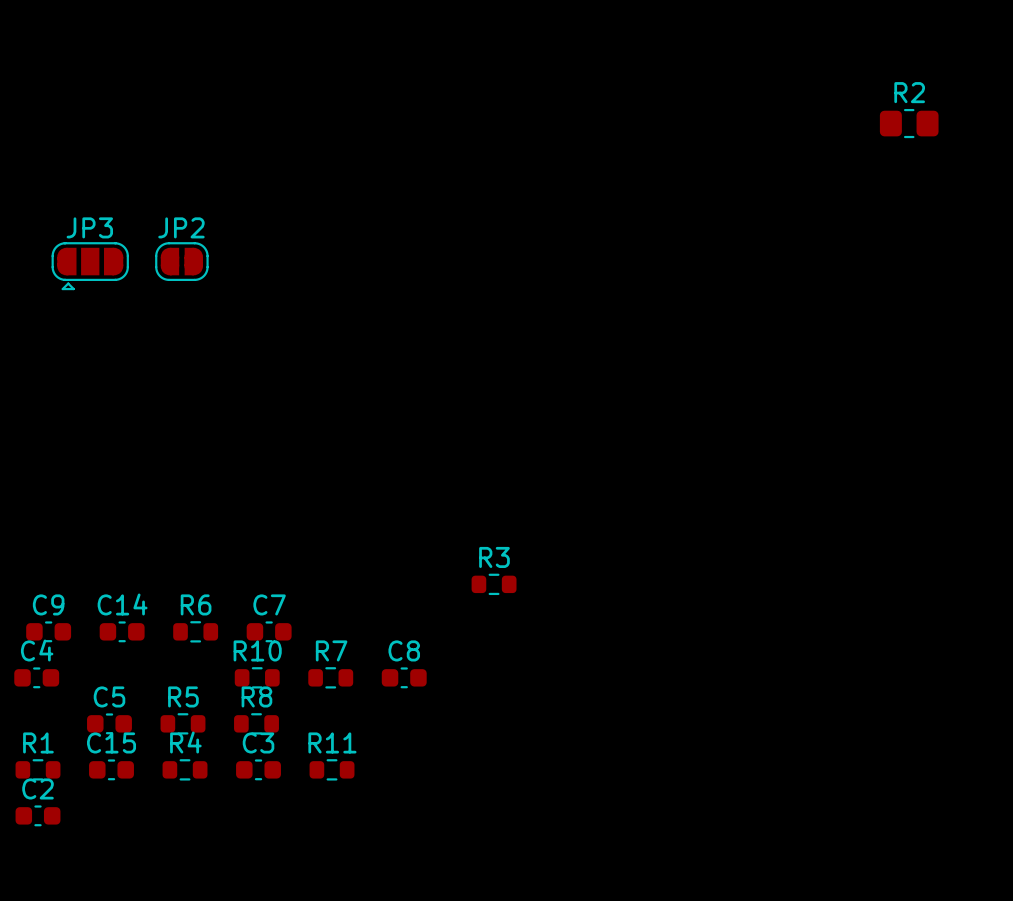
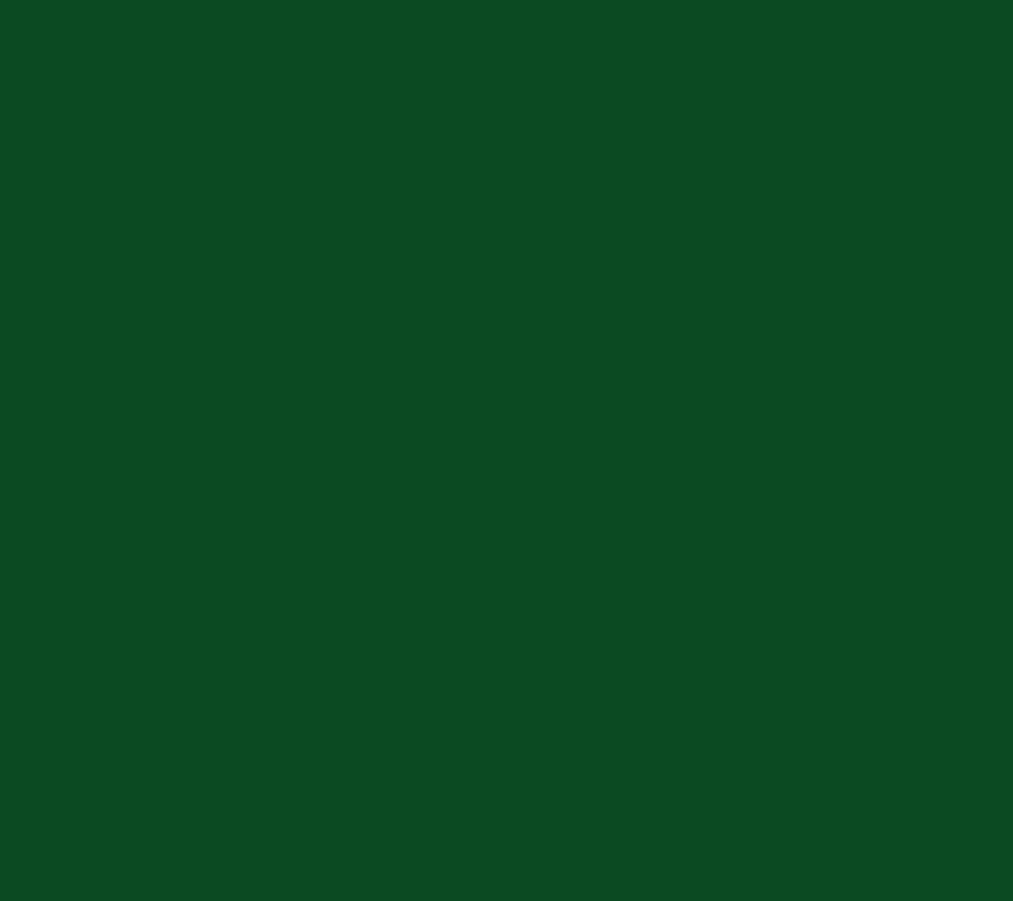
R2: (909, 123) -> none
JP2: (181, 261) -> none
JP3: (90, 266) -> none
R3: (494, 584) -> none
C9: (48, 631) -> none
C14: (122, 631) -> none
R6: (195, 631) -> none
C7: (269, 631) -> none
C4: (36, 677) -> none
R10: (257, 677) -> none
R7: (330, 677) -> none
C8: (404, 677) -> none
C5: (109, 723) -> none
R5: (182, 723) -> none
R8: (256, 723) -> none
R1: (38, 769) -> none
C15: (111, 769) -> none
R4: (185, 769) -> none
C3: (258, 769) -> none
R11: (332, 769) -> none
C2: (38, 815) -> none

